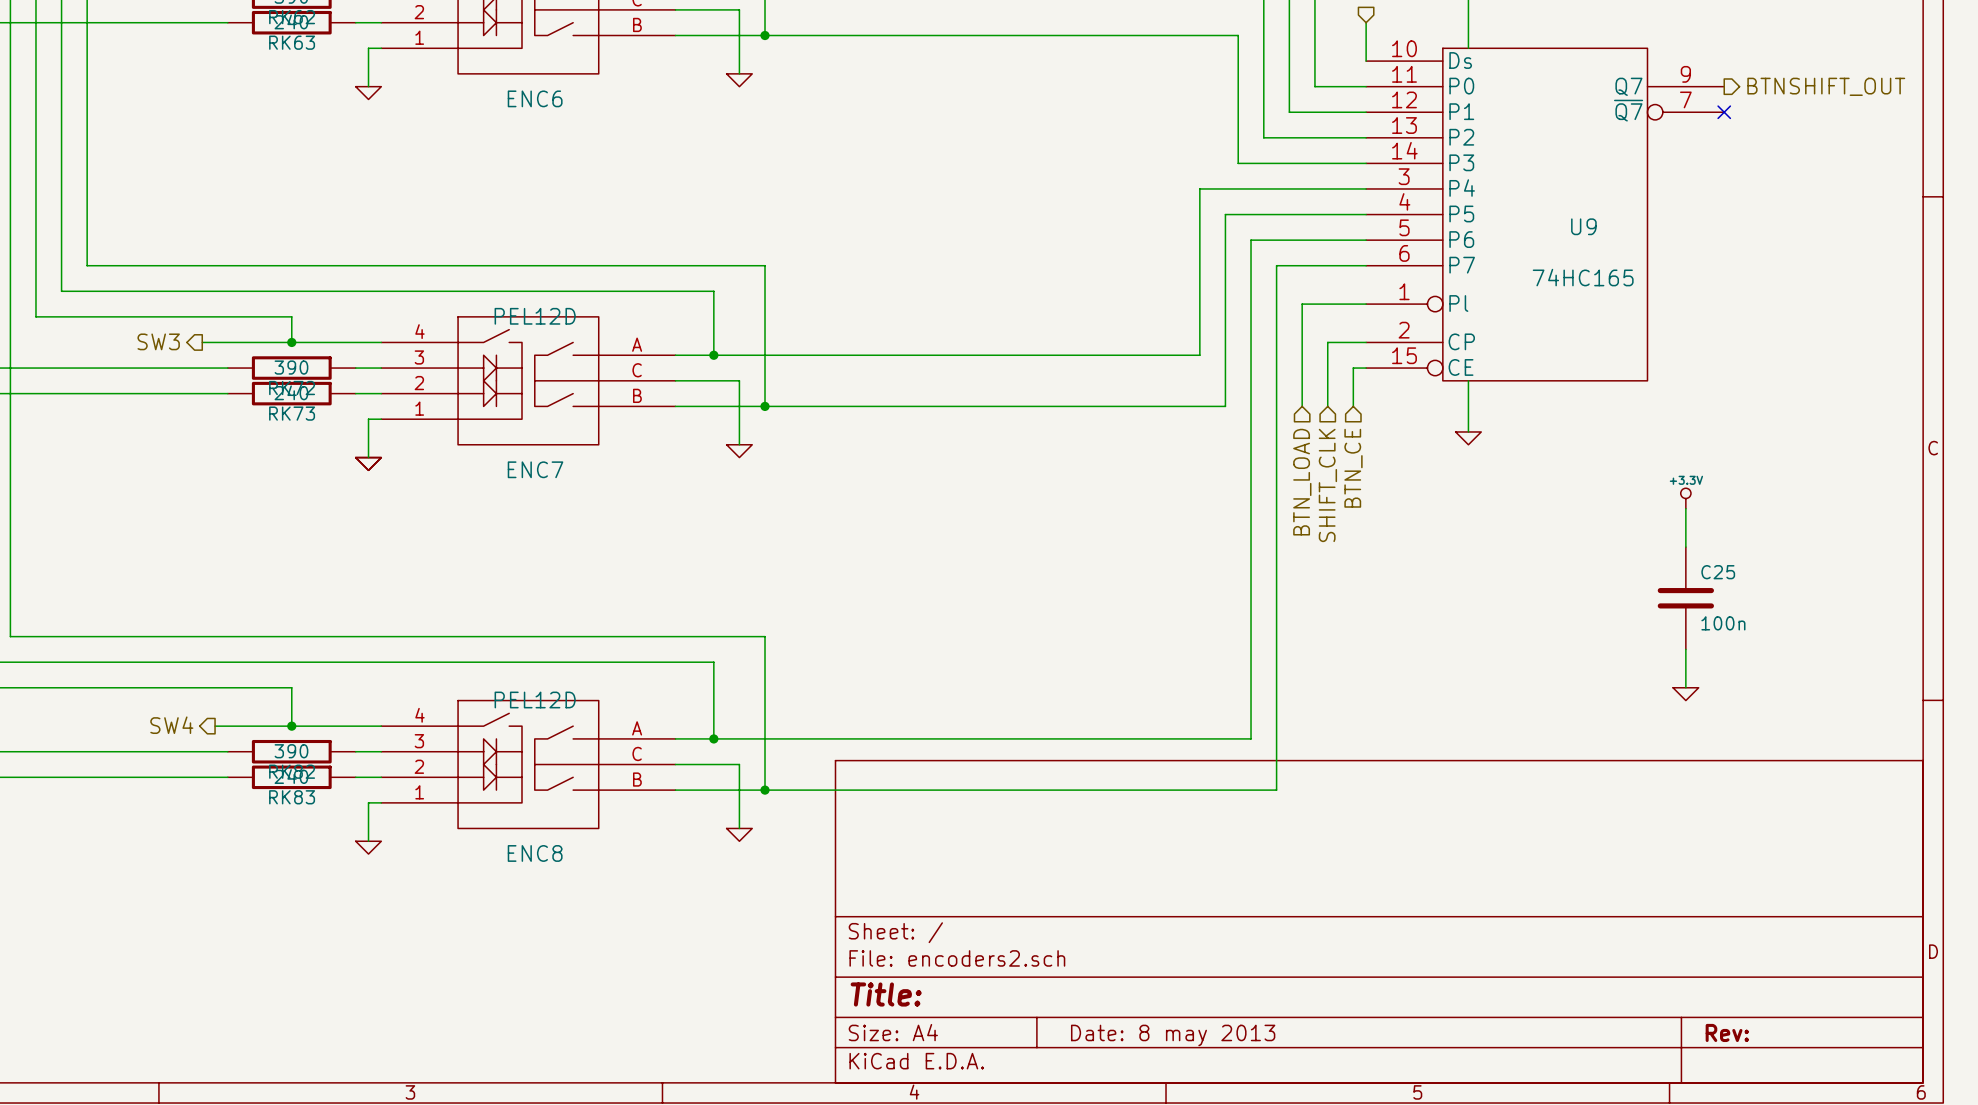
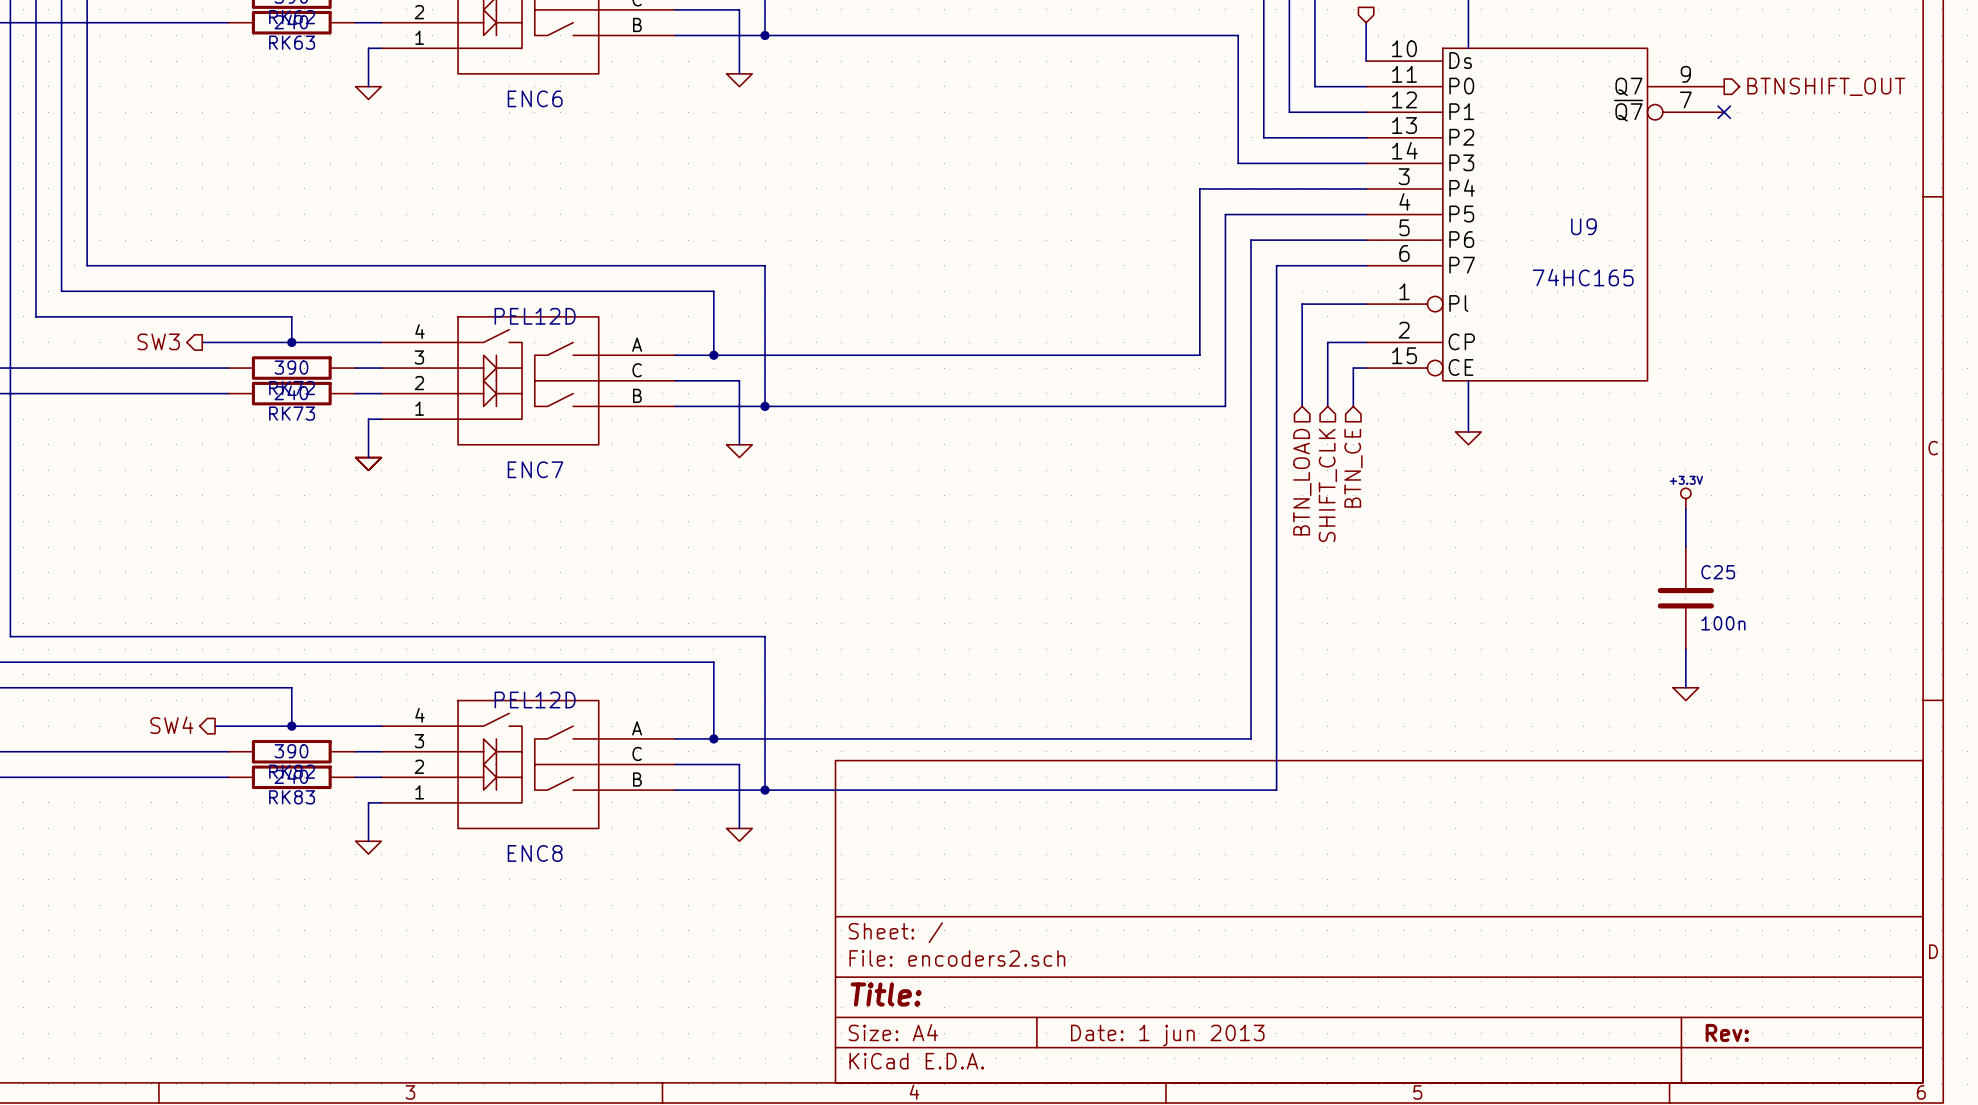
title block: Date: 8 may 2013 (1173, 1035) -> Date: 1 jun 2013 (1167, 1035)

